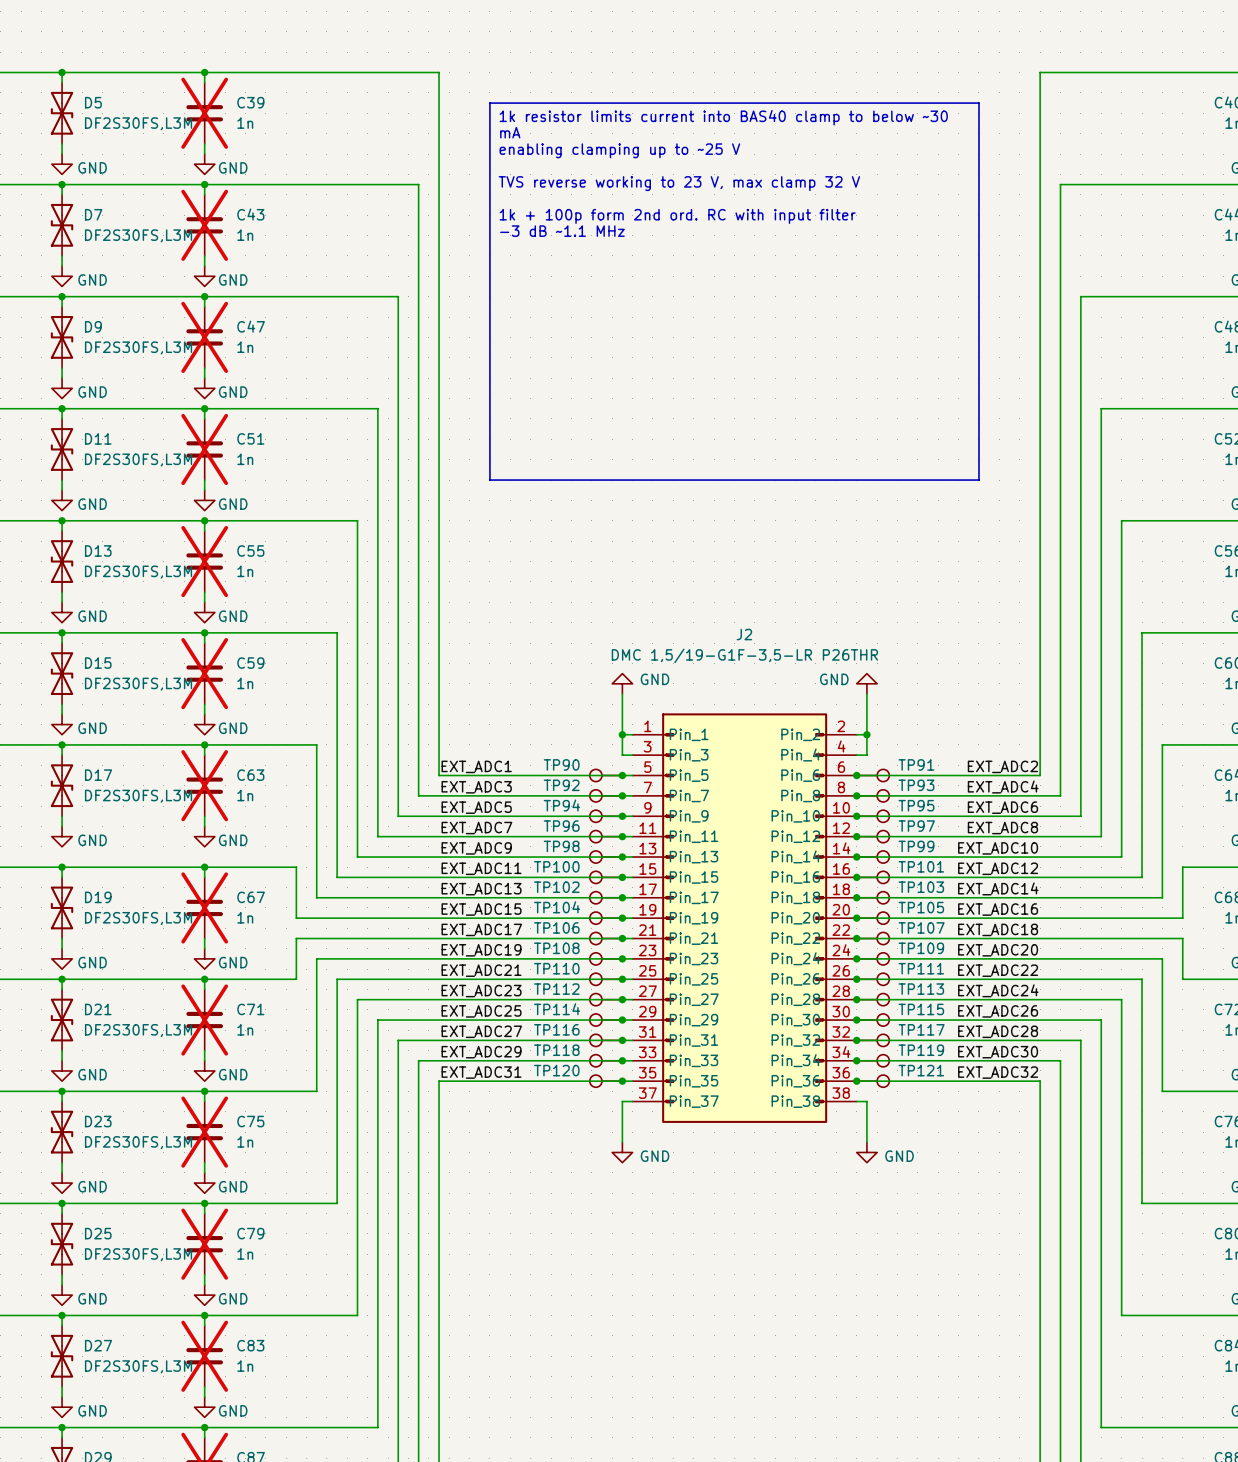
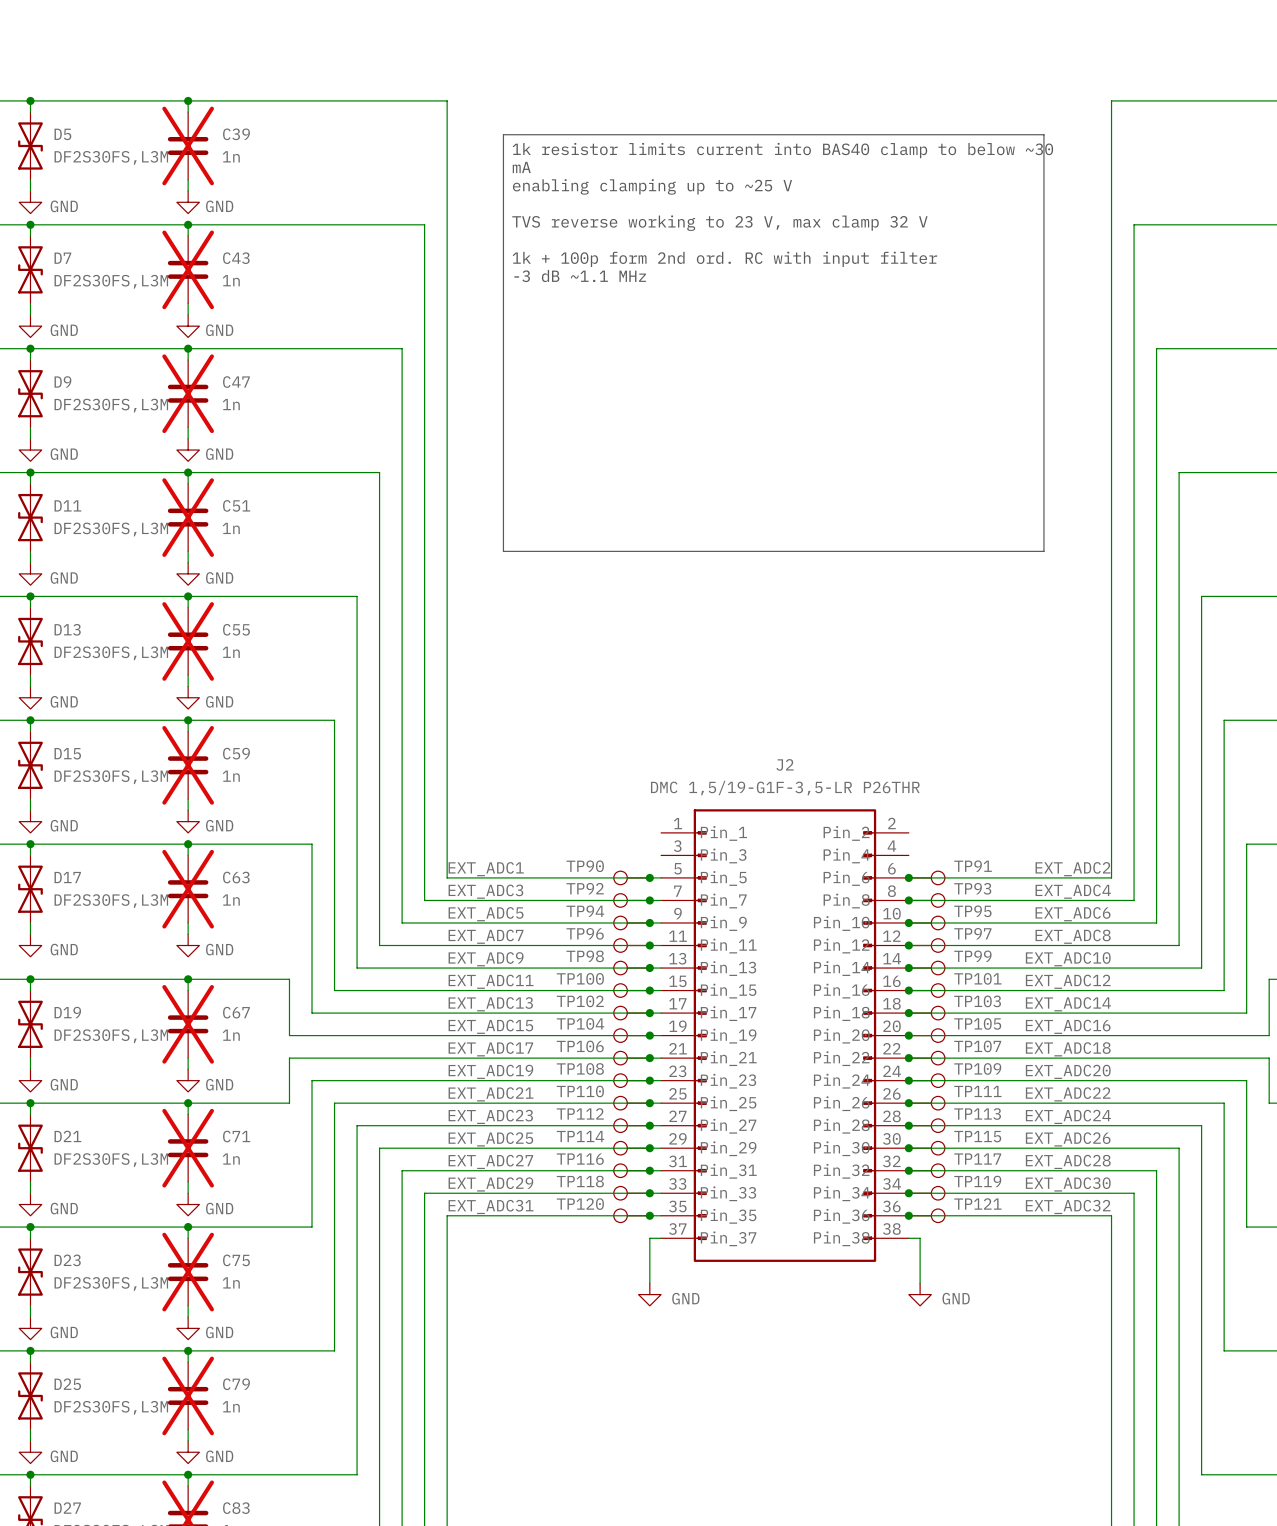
J2 name position: J2 (744, 634) -> J2 (785, 764)
J2 value position: DMC 1,5/19-G1F-3,5-LR P26THR (744, 655) -> DMC 1,5/19-G1F-3,5-LR P26THR (785, 788)
power symbol: GND (622, 683) -> none
power symbol: GND (866, 683) -> none
wire: (622, 694) (622, 755) (632, 755) -> none
wire: (866, 694) (866, 755) (856, 755) -> none
wire: (622, 734) (632, 734) -> none
junction: (622, 734) -> none
wire: (856, 734) (866, 734) -> none
junction: (866, 734) -> none

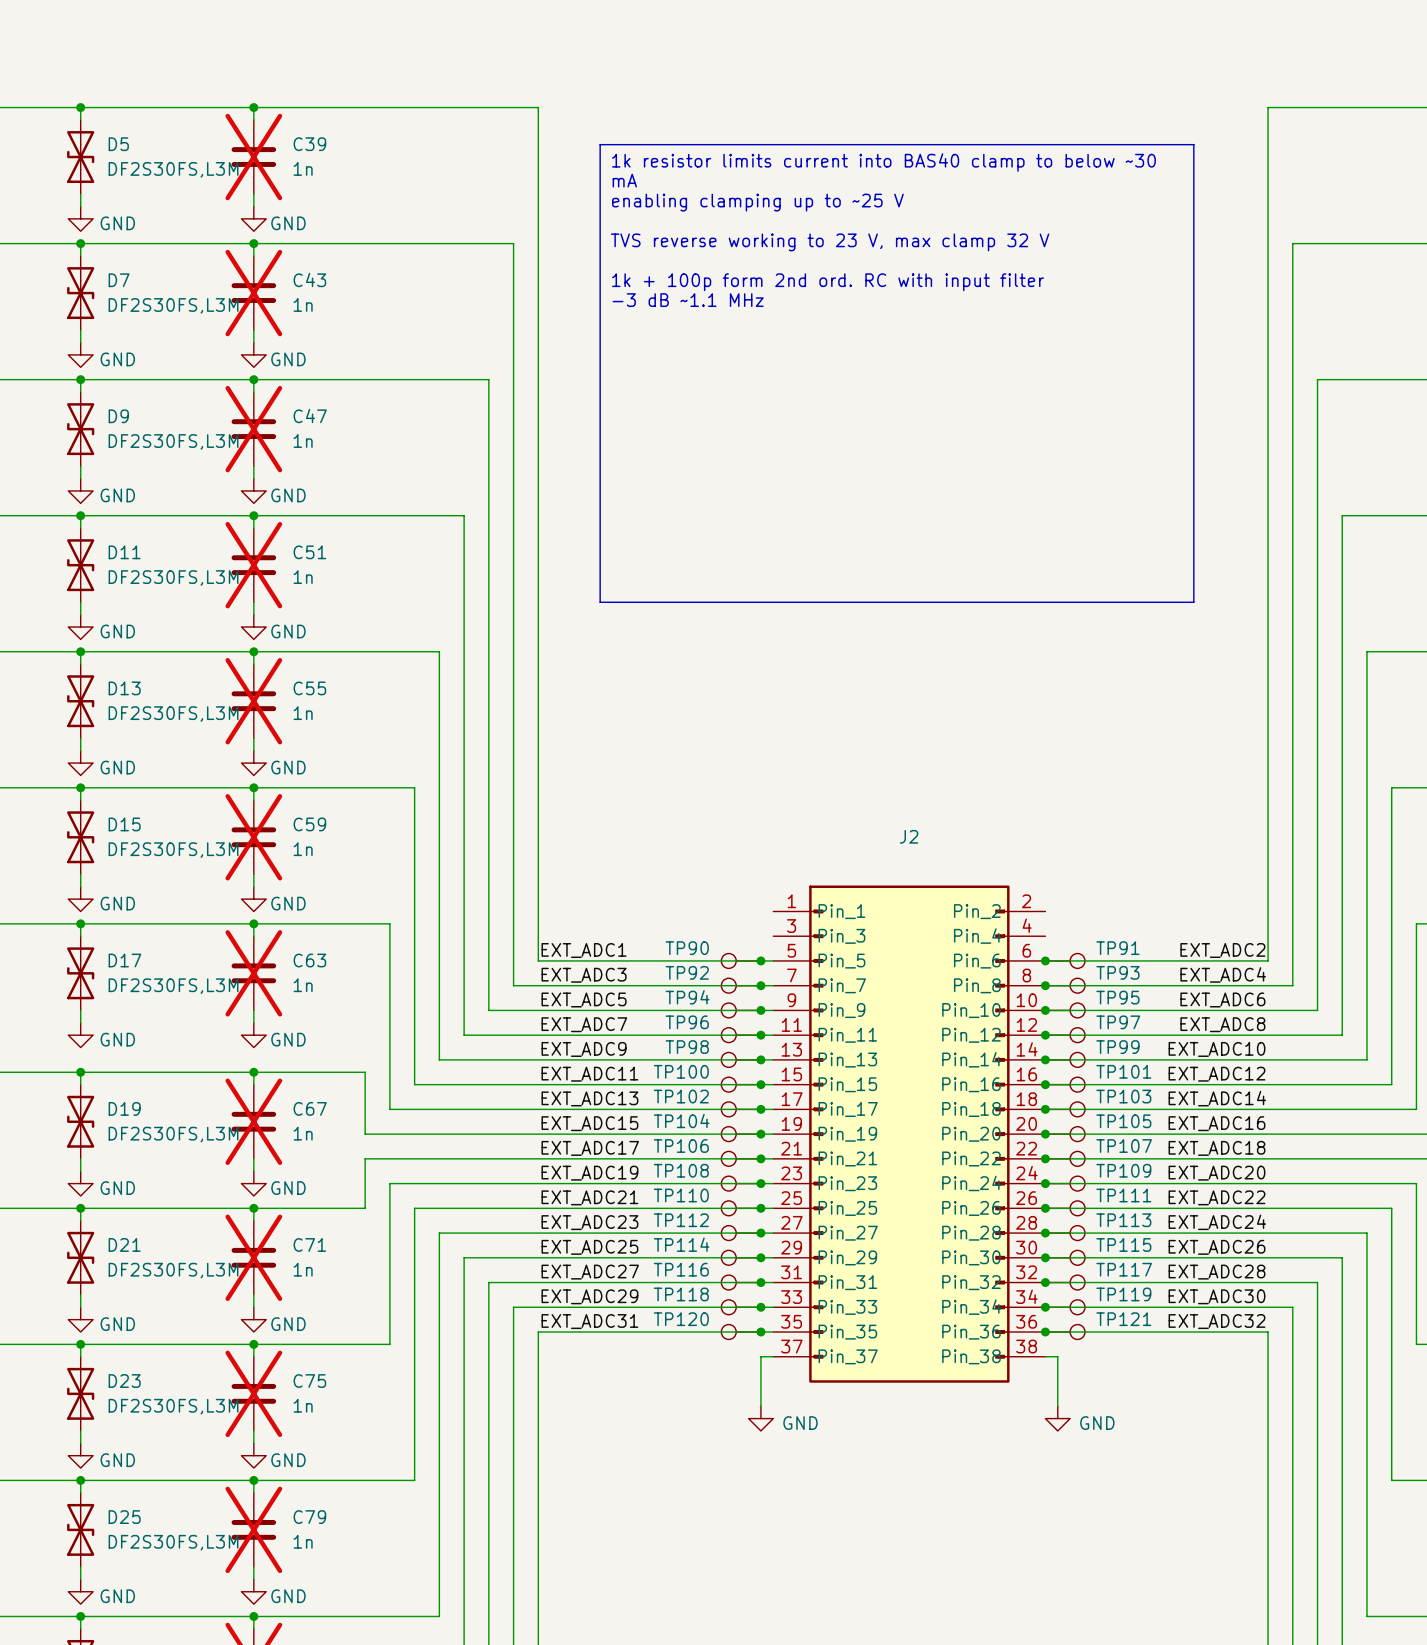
J2 value: DMC 1,5/19-G1F-3,5-LR P26THR (785, 788) -> none

